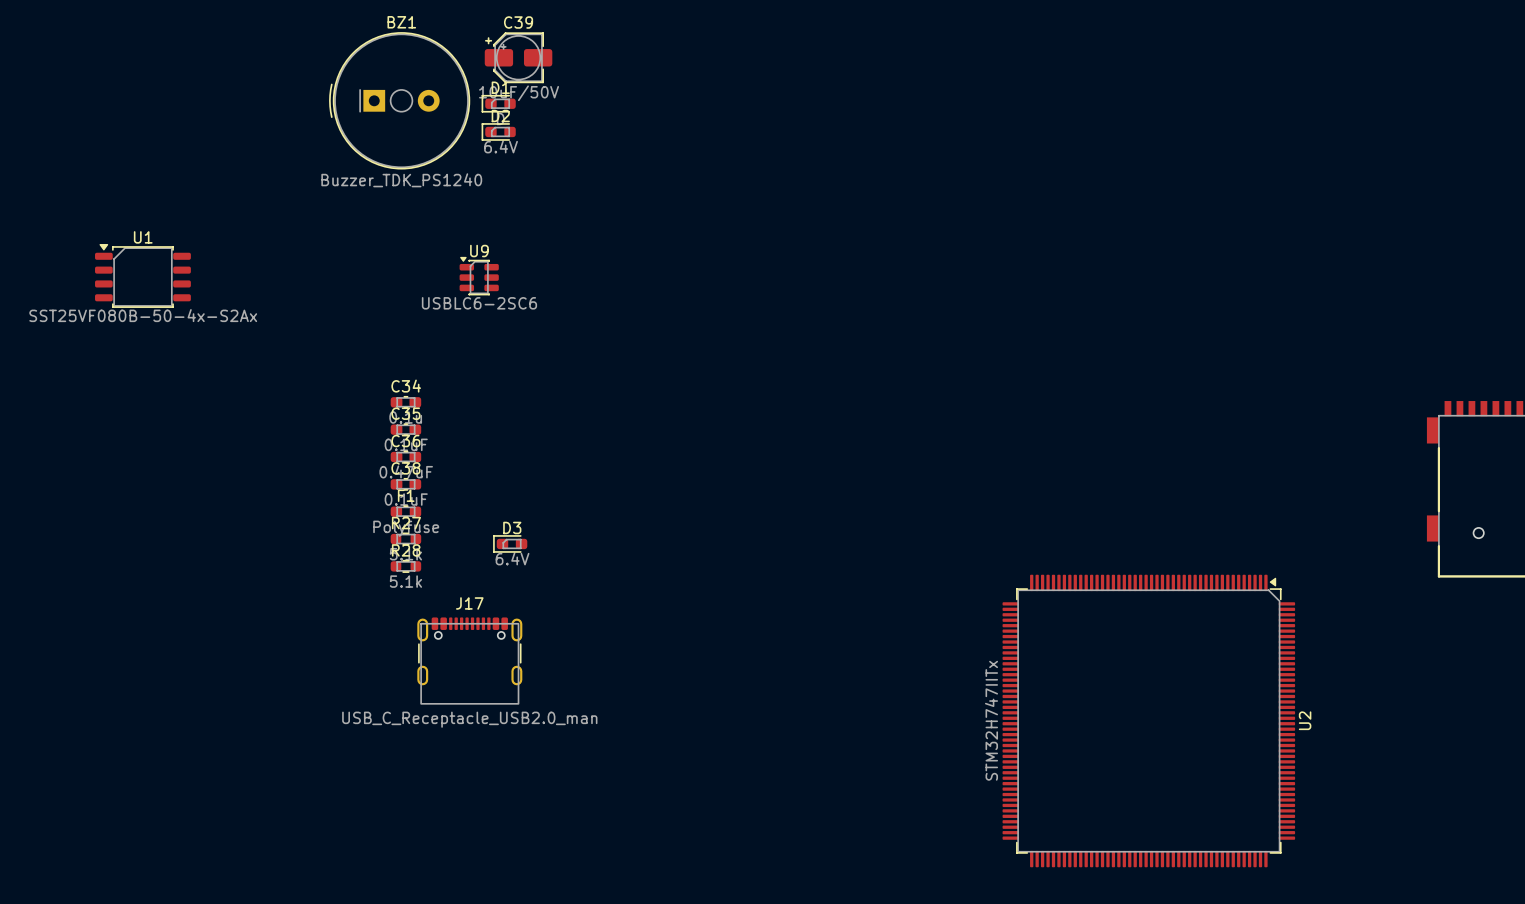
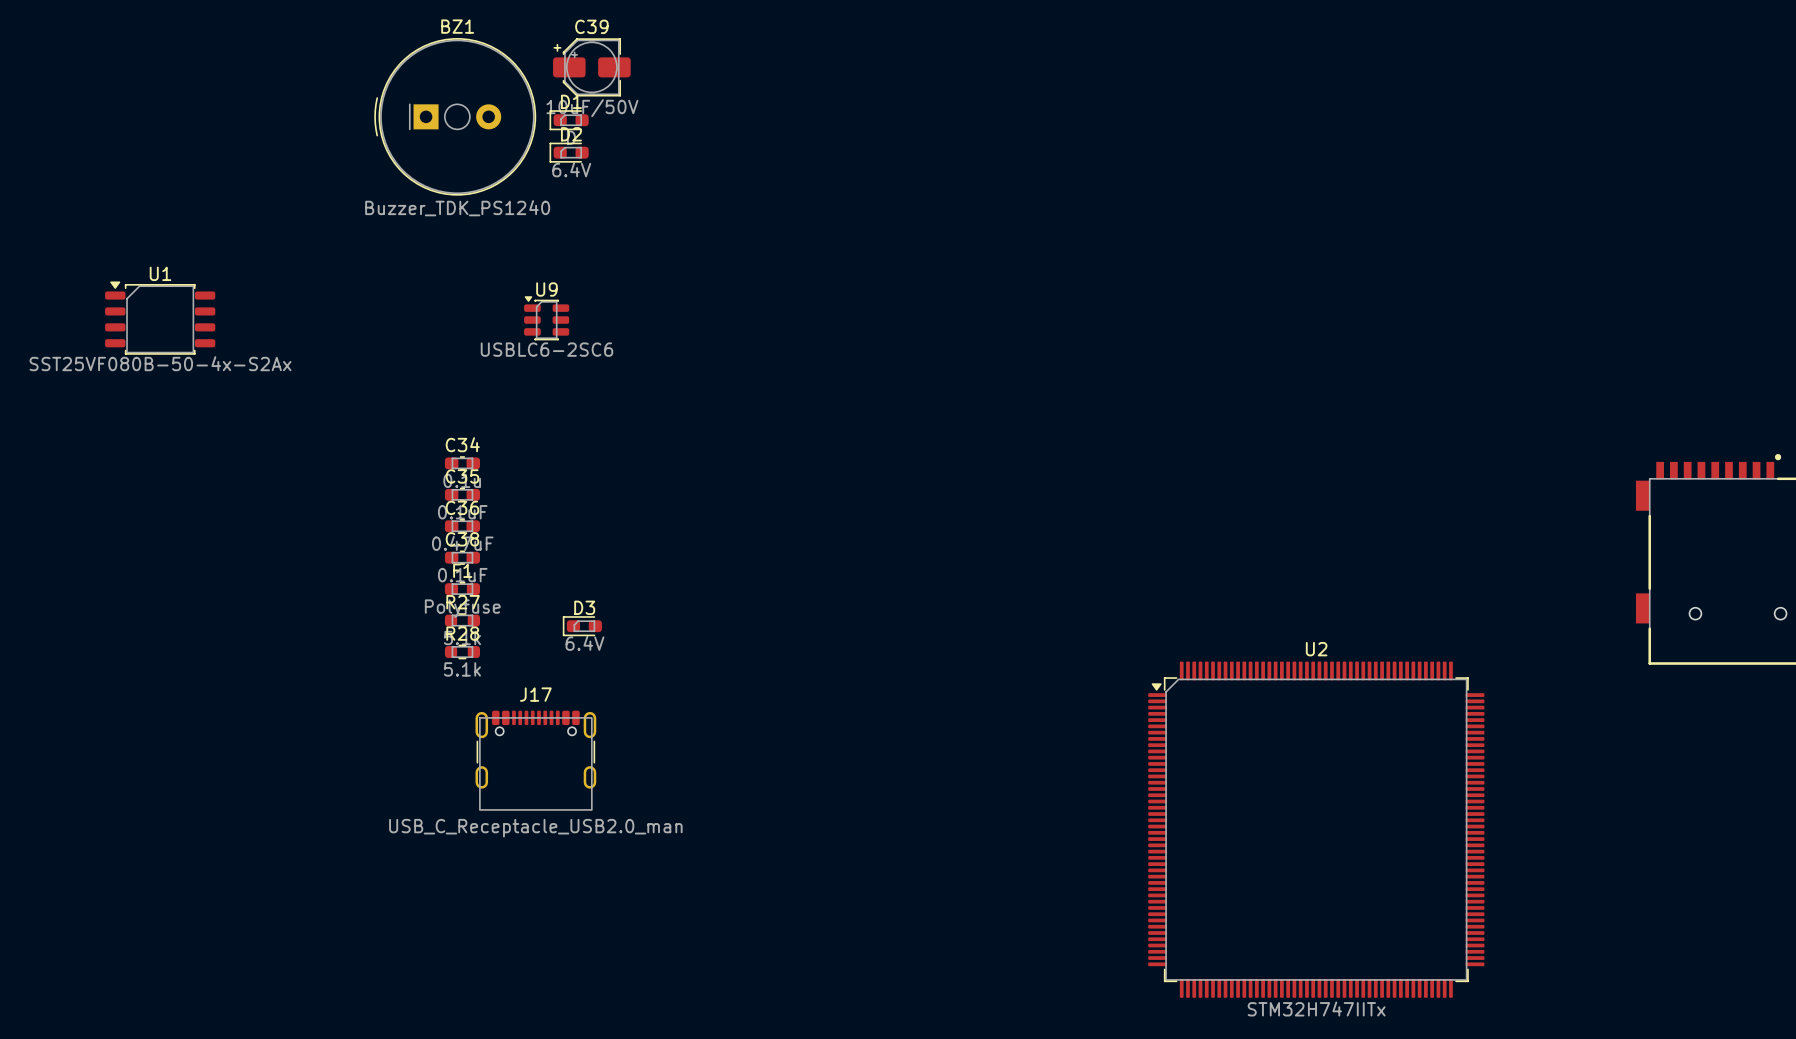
U2 rotation: 0° (1148, 721) -> 90° counterclockwise (1316, 829)

